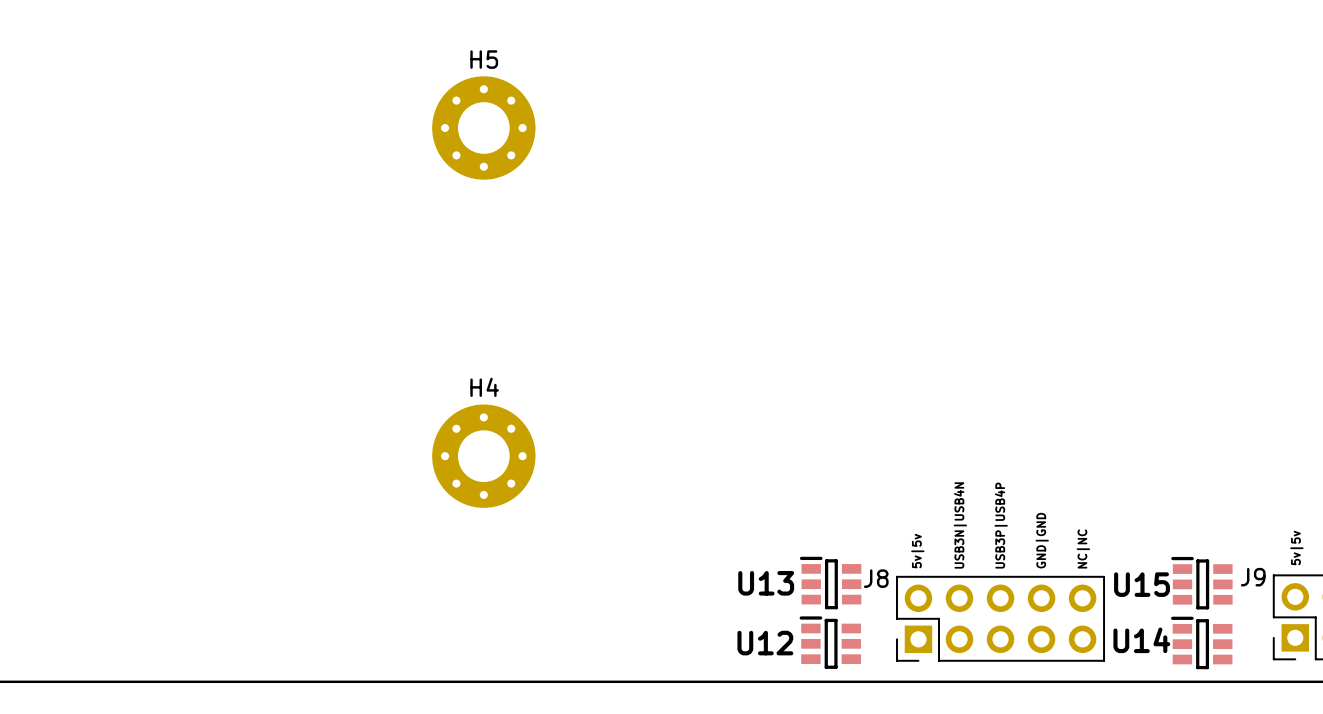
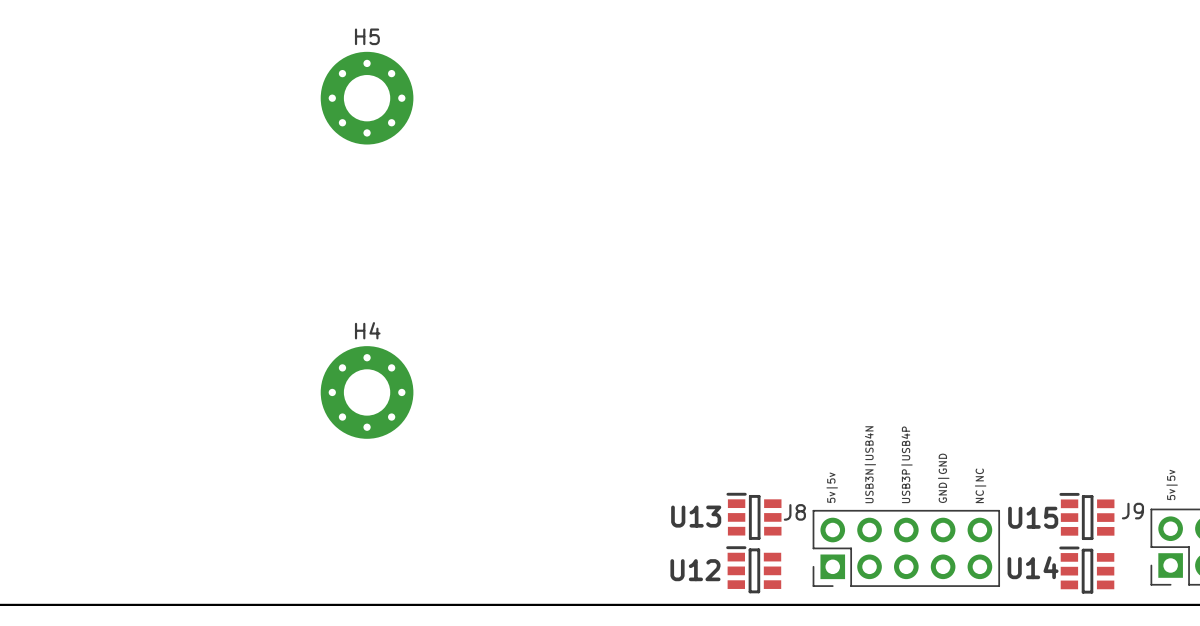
H5 position: (483, 127) -> (367, 98)
H4 position: (483, 456) -> (367, 392)

